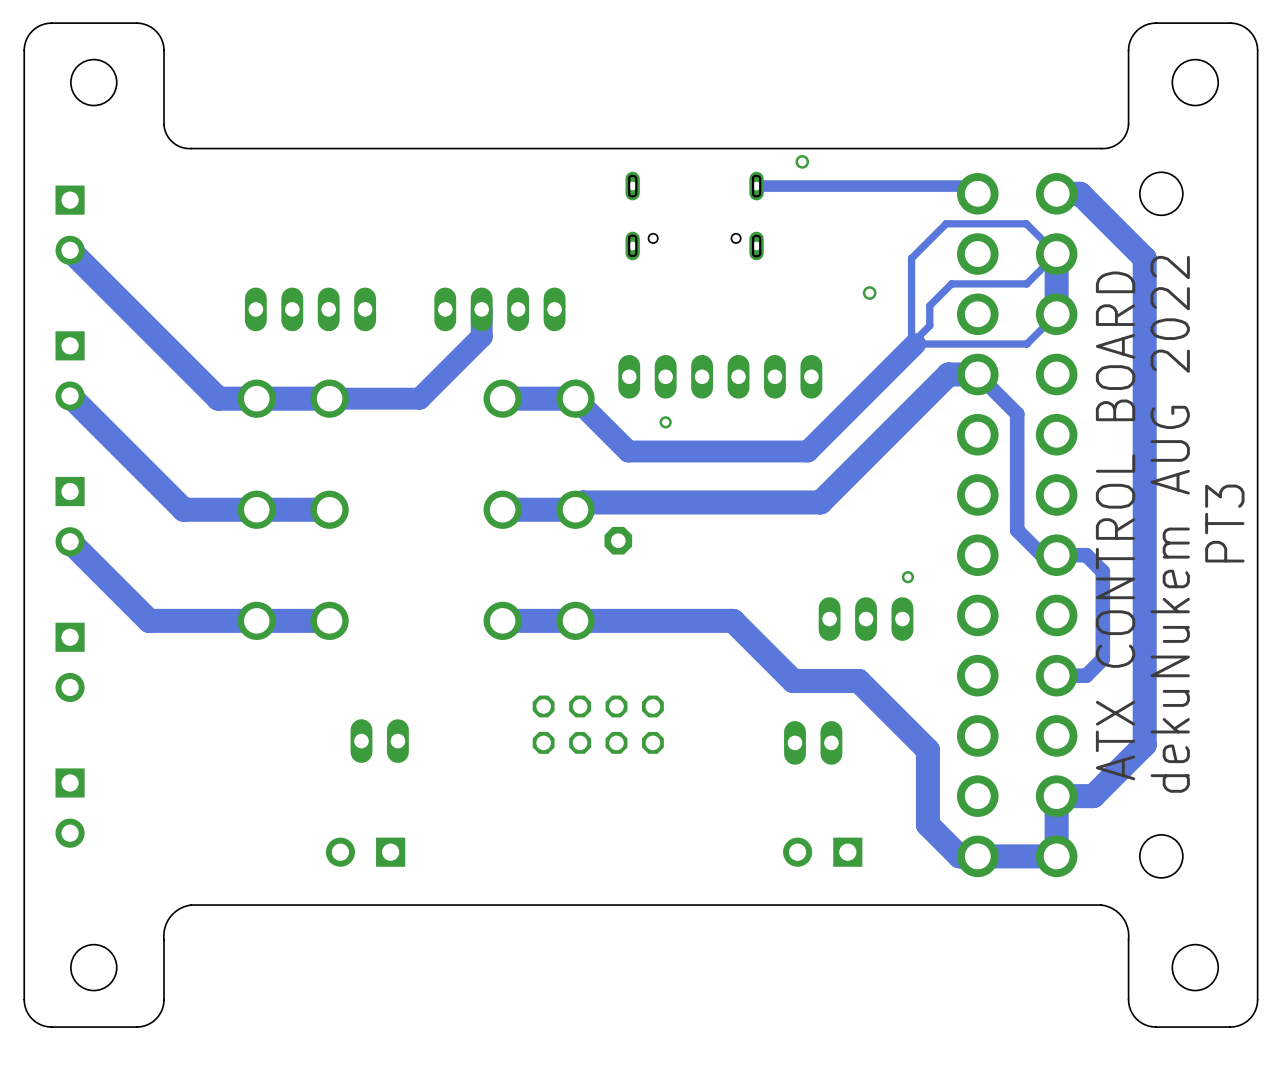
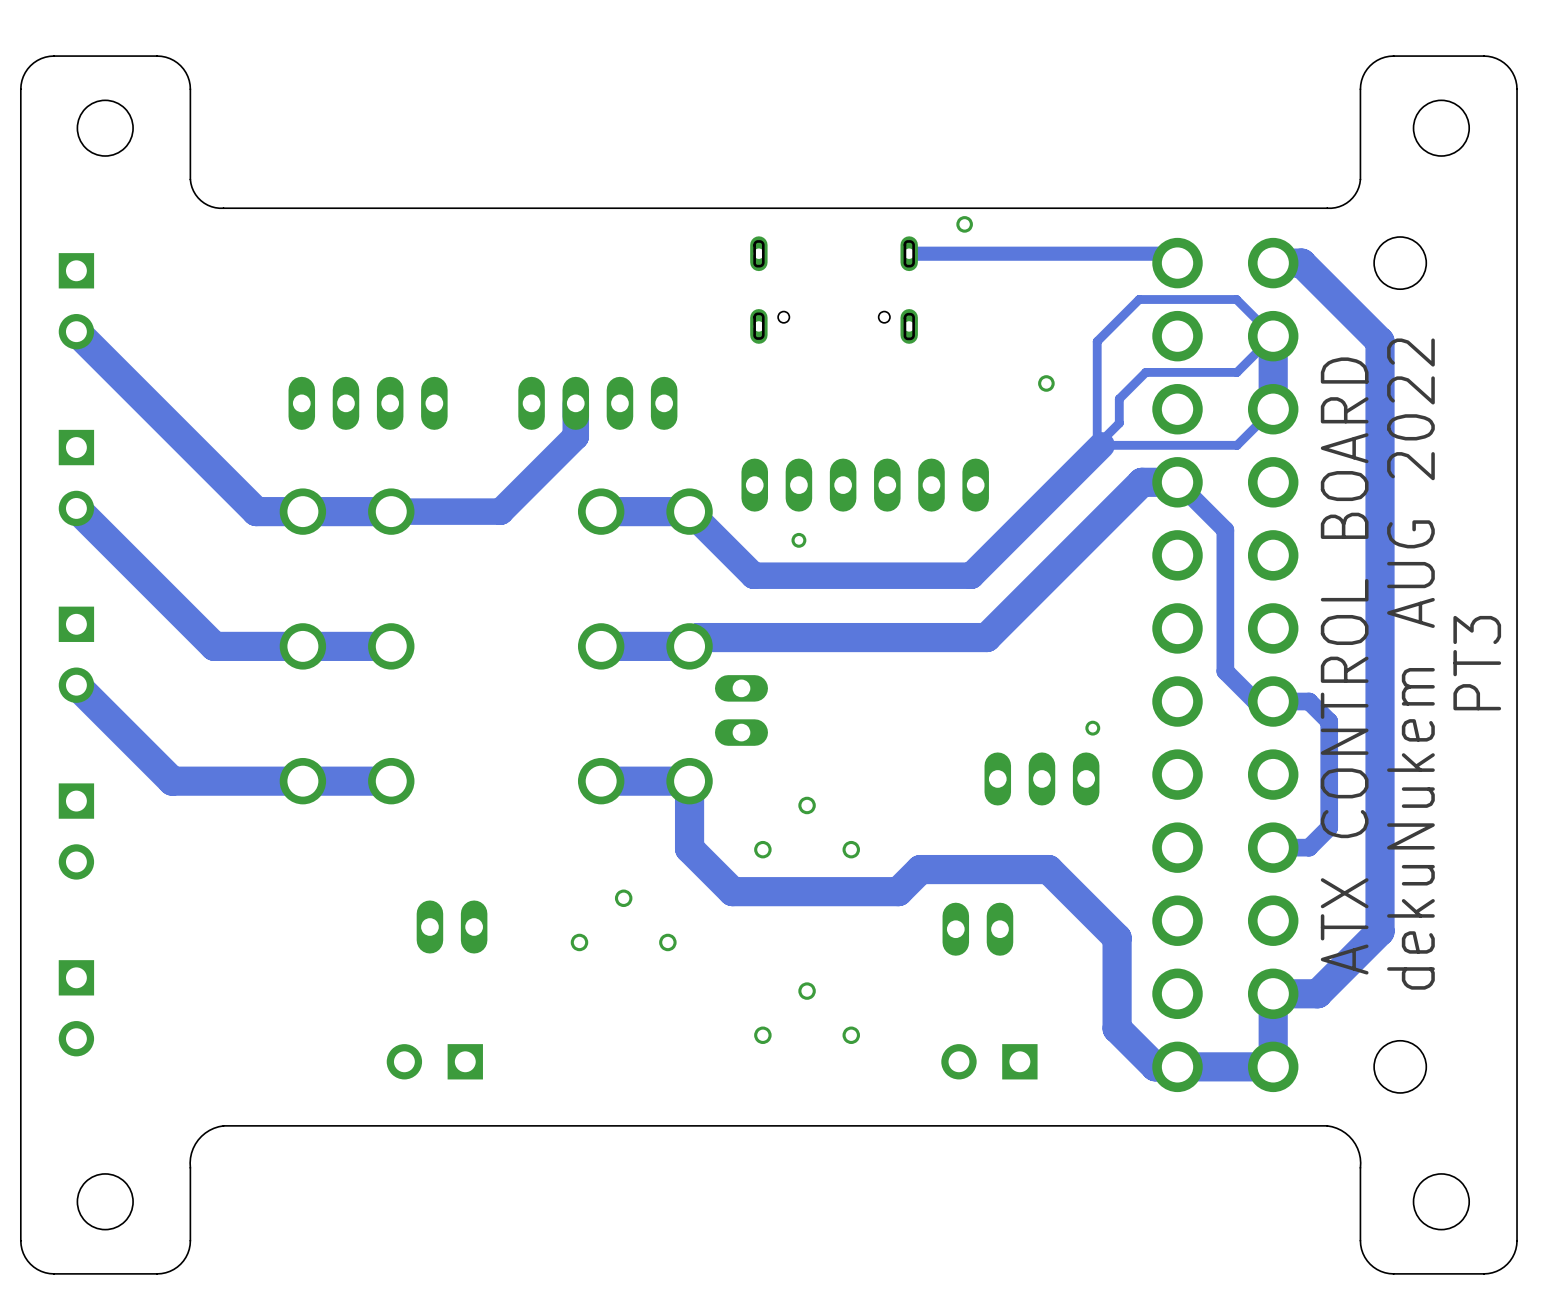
part: (618, 540) -> none
part: none -> (741, 710)
track: (575, 620) (733, 620) (793, 680) (858, 680) (871, 693) -> (689, 781) (689, 848) (732, 891) (898, 891) (920, 869) (1048, 869)
part: none -> (807, 827)
part: (598, 724) -> none
part: none -> (623, 920)
part: none -> (807, 1013)

